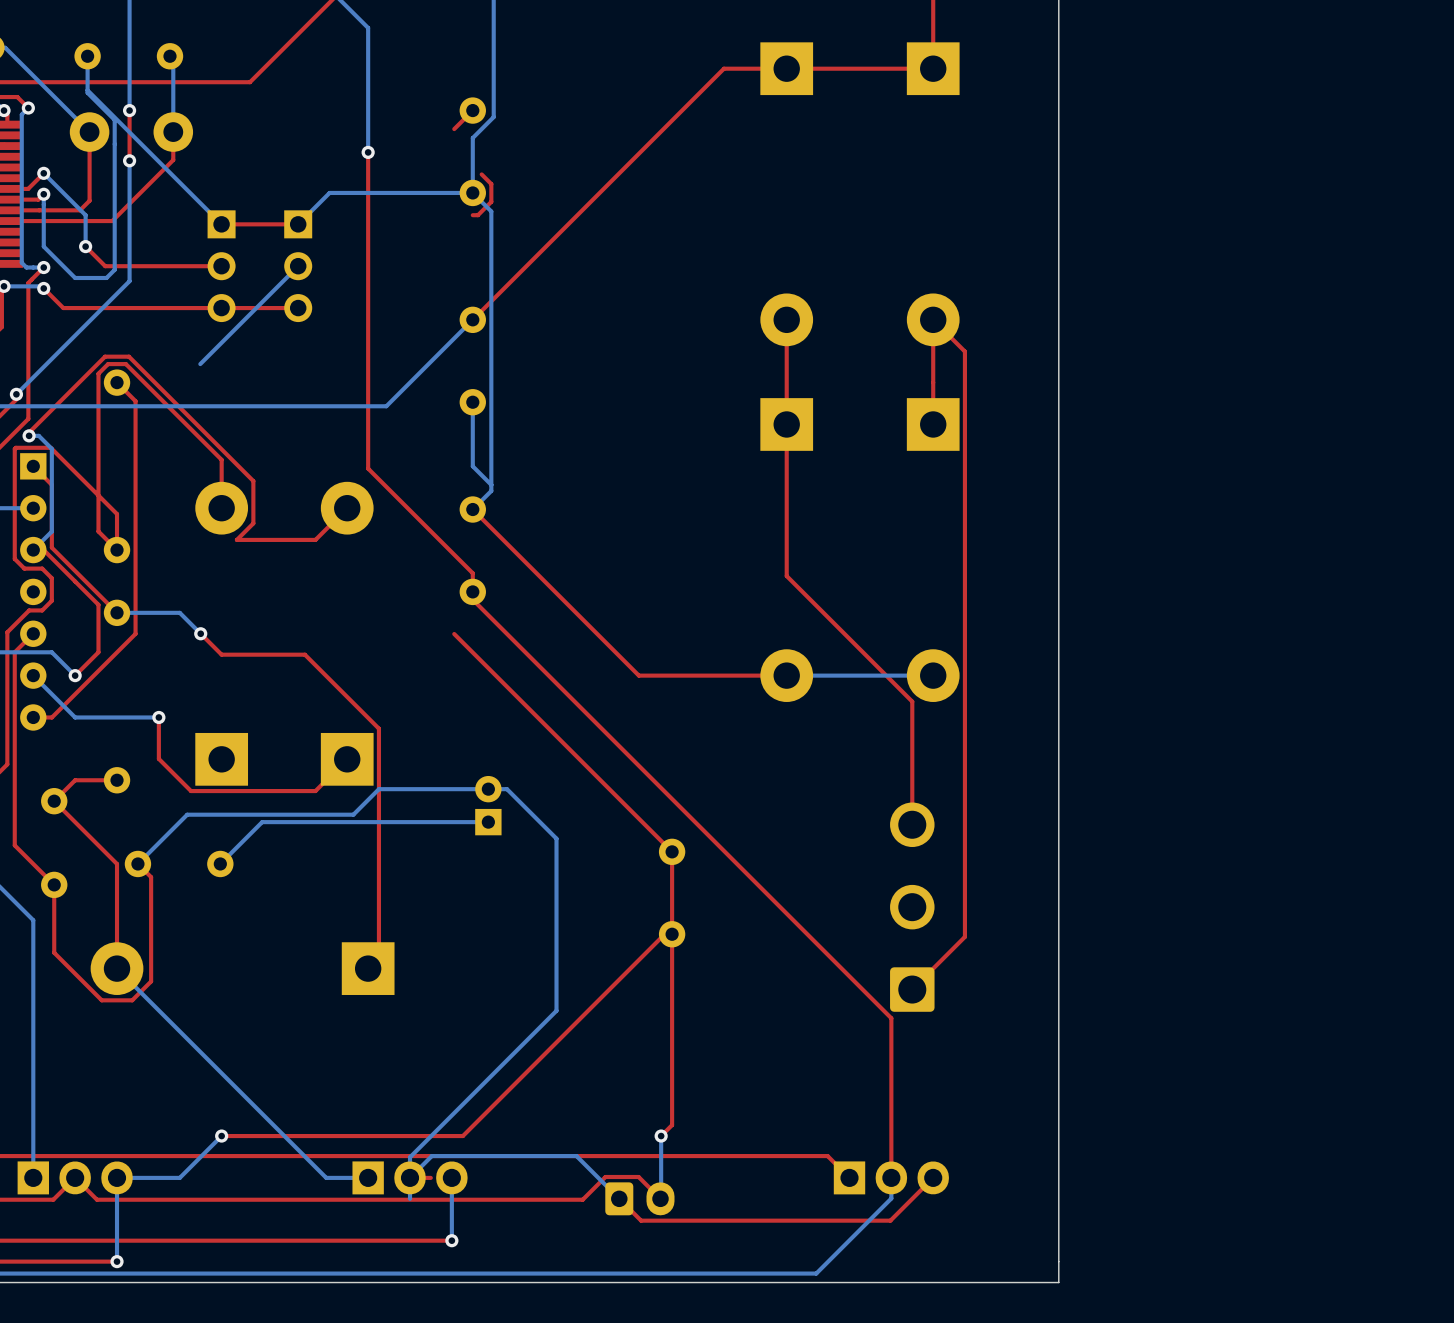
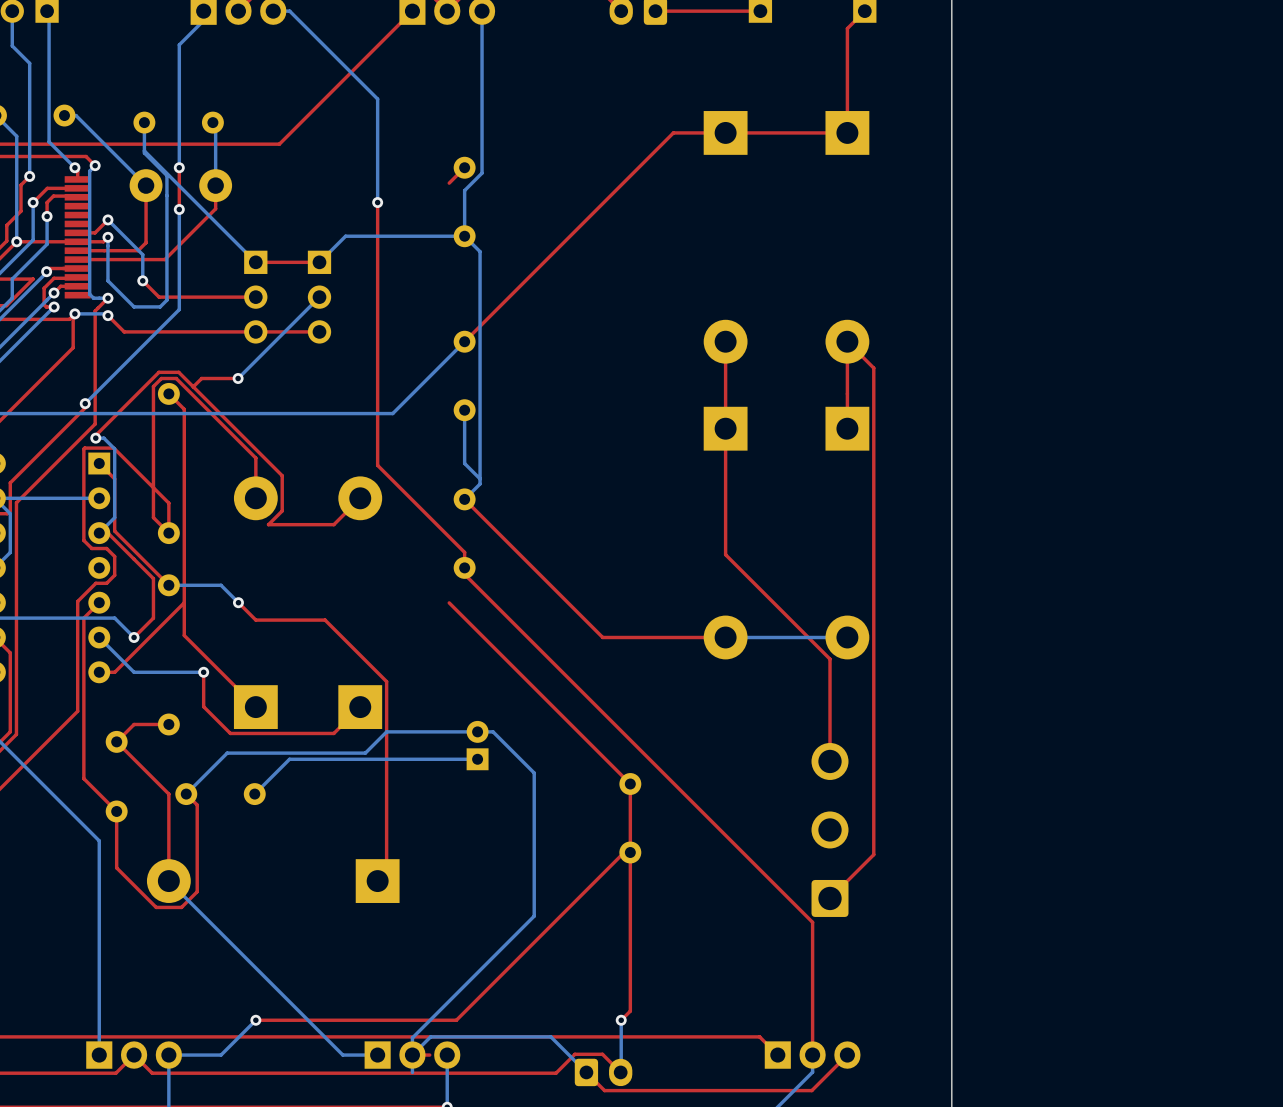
top track: (481, 174) (491, 184) (491, 201) (477, 215) (472, 215) -> none
top track: none -> (238, 378) (201, 378) (193, 386)
via: none -> (238, 378)
top track: none -> (184, 602) (184, 635) (255, 707)

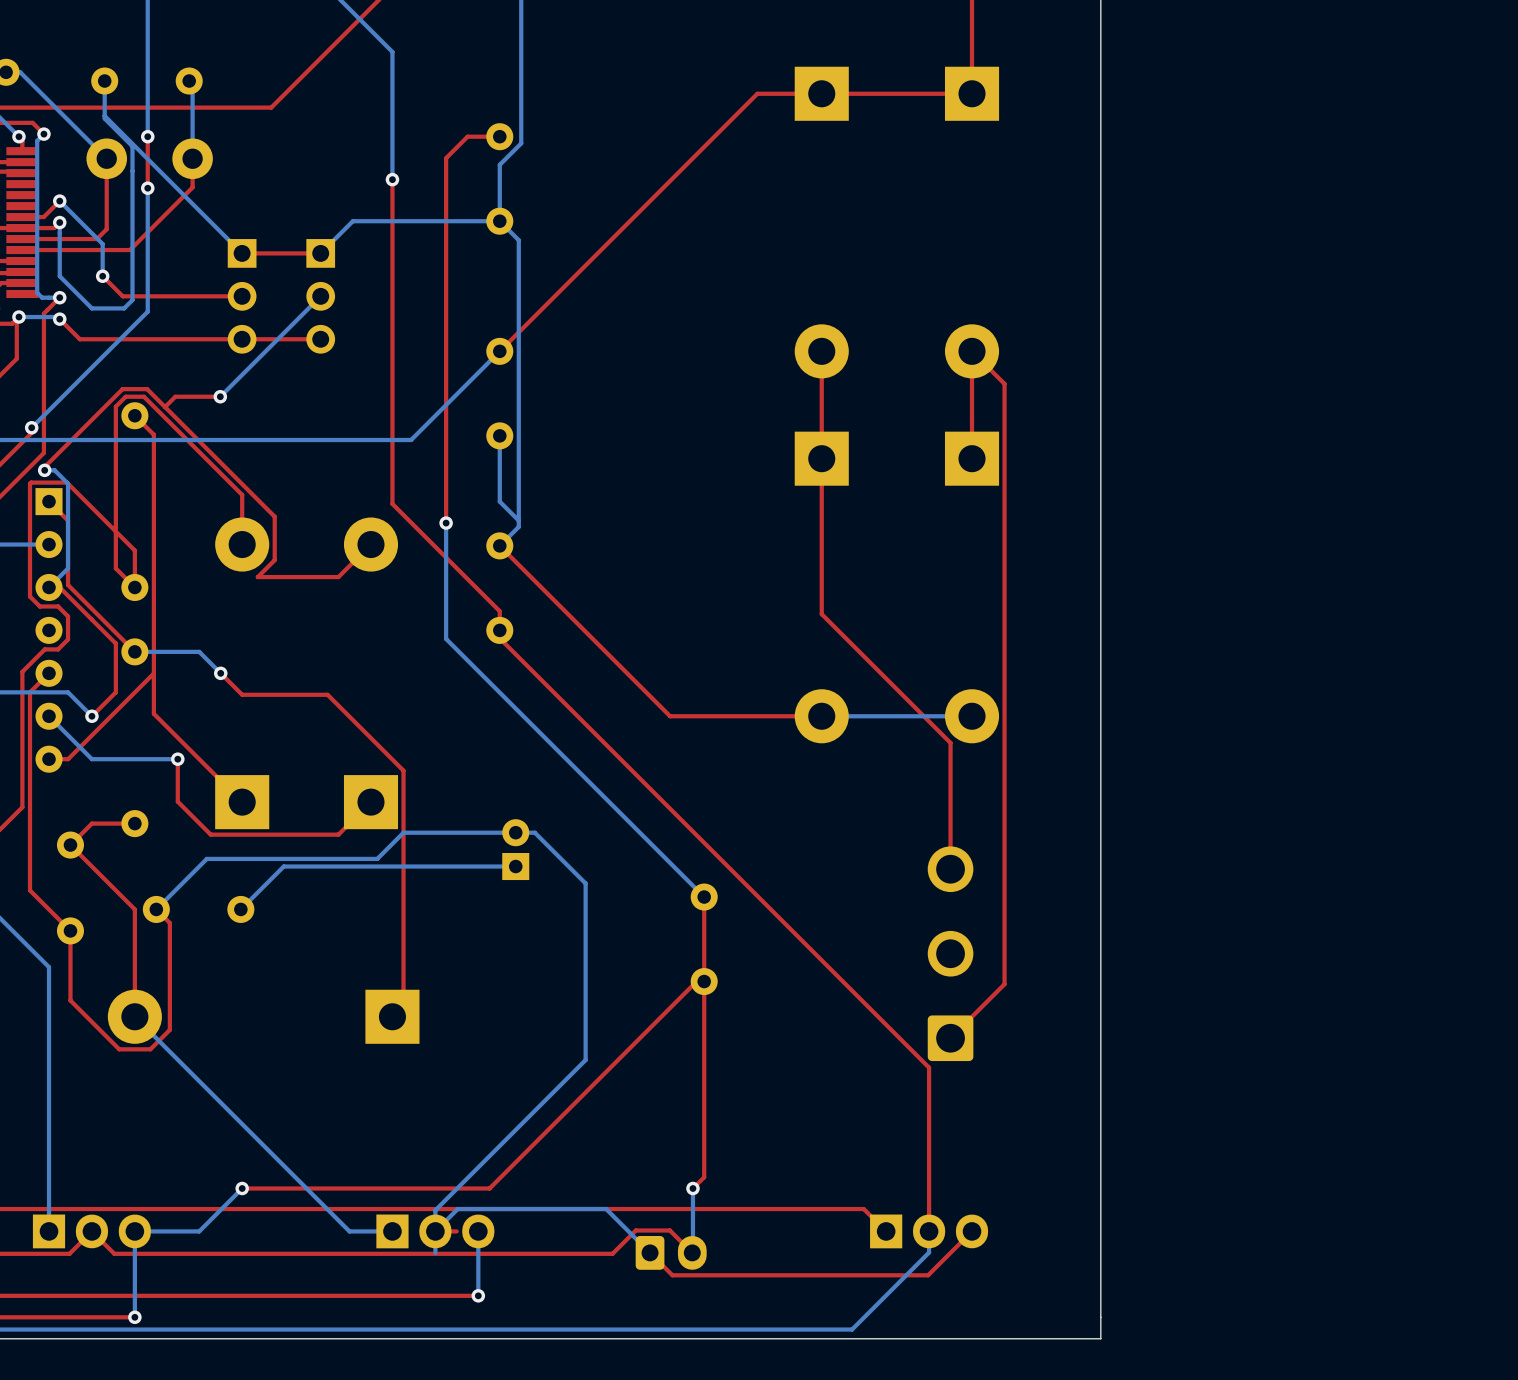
top track: (464, 167) (449, 183) -> (499, 136) (467, 136) (446, 158) (446, 523)
bottom track: none -> (446, 523) (446, 638) (704, 897)
via: none -> (446, 523)
top track: (449, 602) (630, 784) -> none

